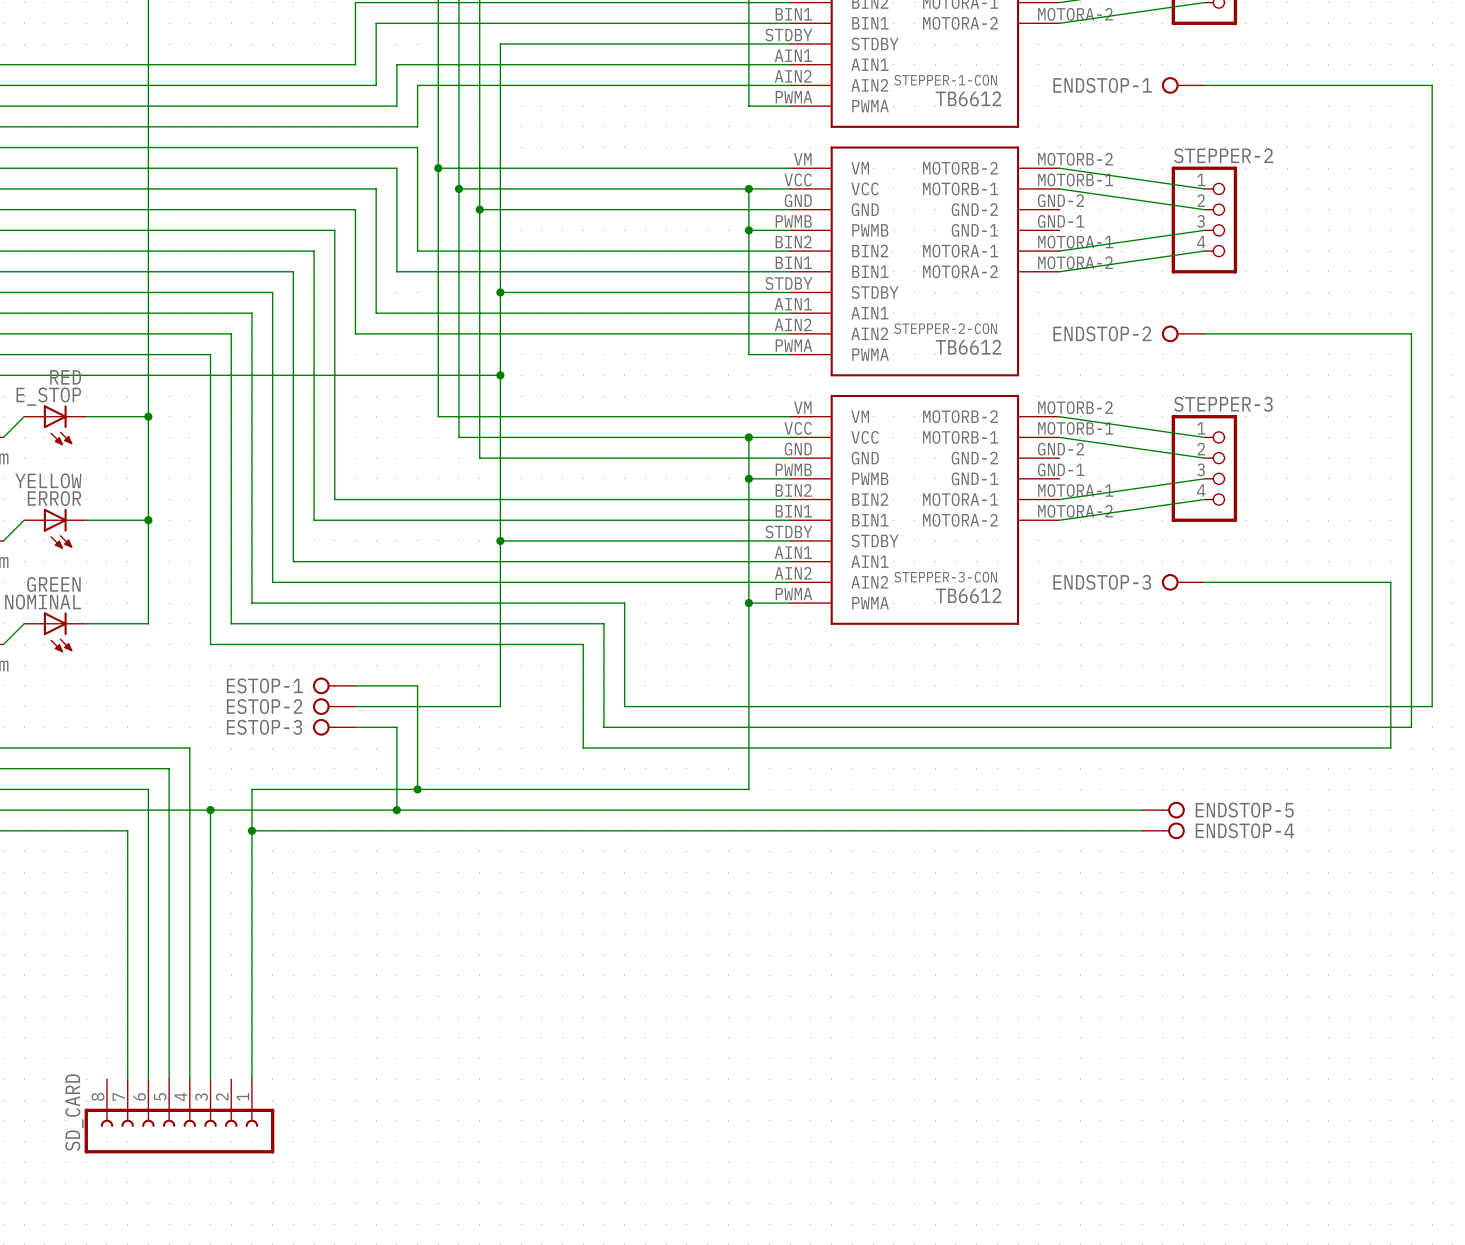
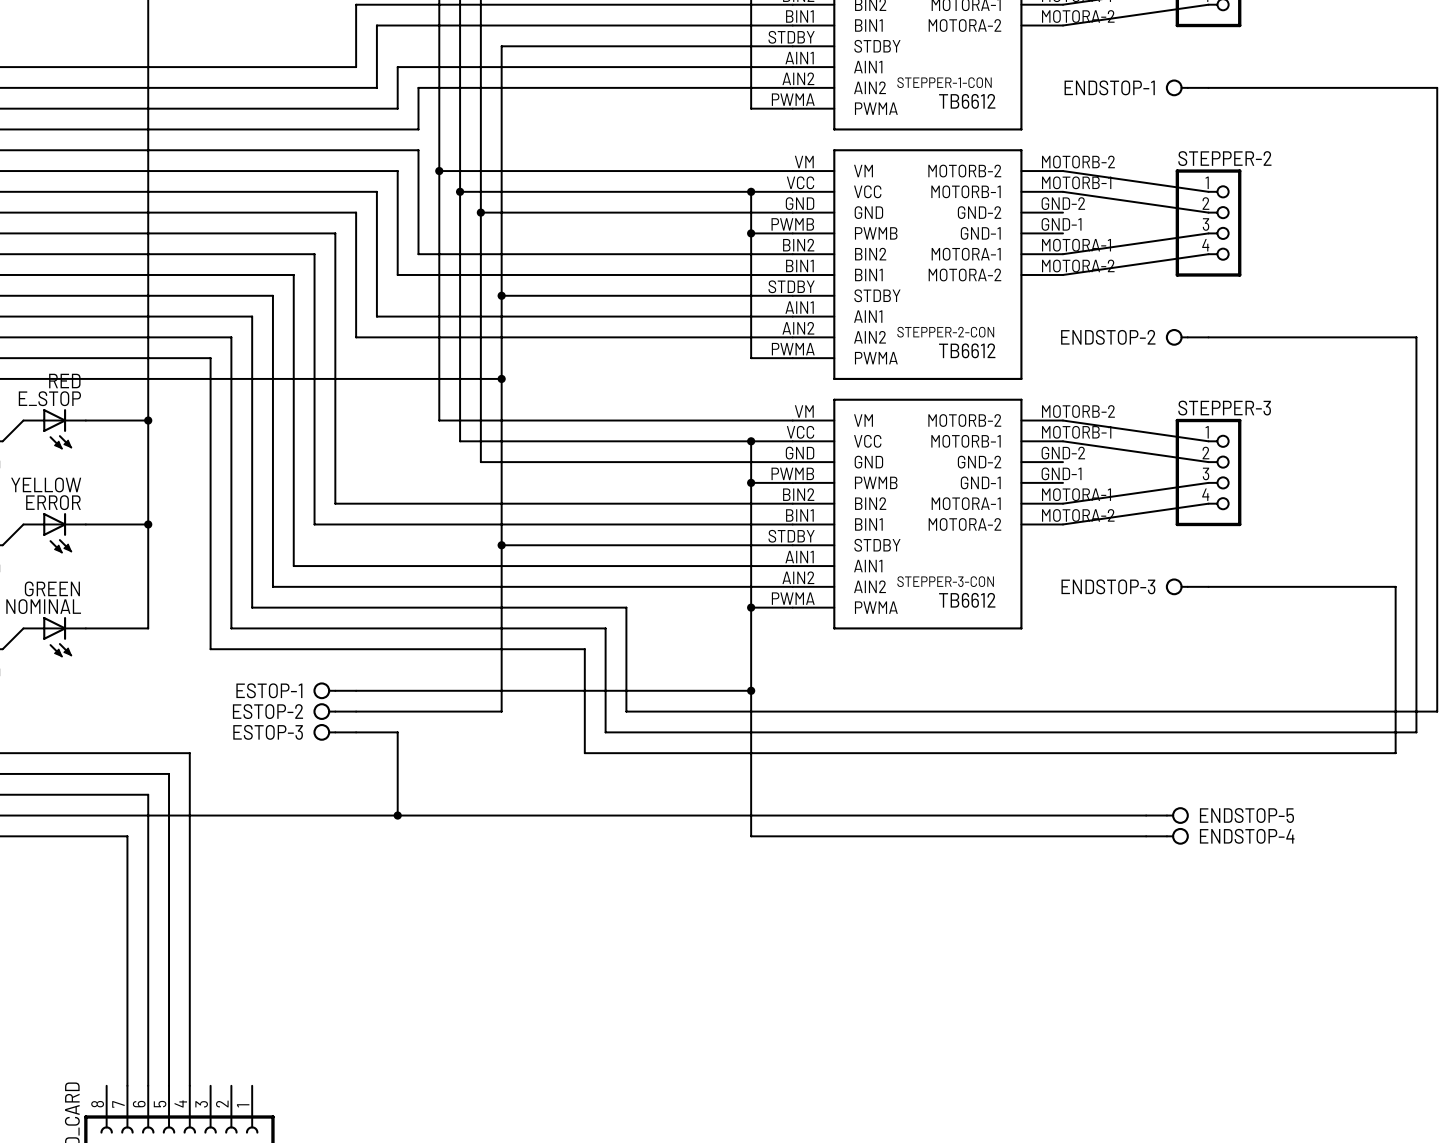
wire: (417, 685) (417, 789) -> (418, 690) (751, 690)
junction: none -> (751, 690)
junction: (417, 789) -> none
wire: (748, 789) (251, 789) (251, 1079) -> none
wire: (210, 810) (210, 1079) -> none
junction: (210, 810) -> none
wire: (251, 830) (748, 830) -> (751, 794) (751, 836)
junction: (251, 830) -> none

